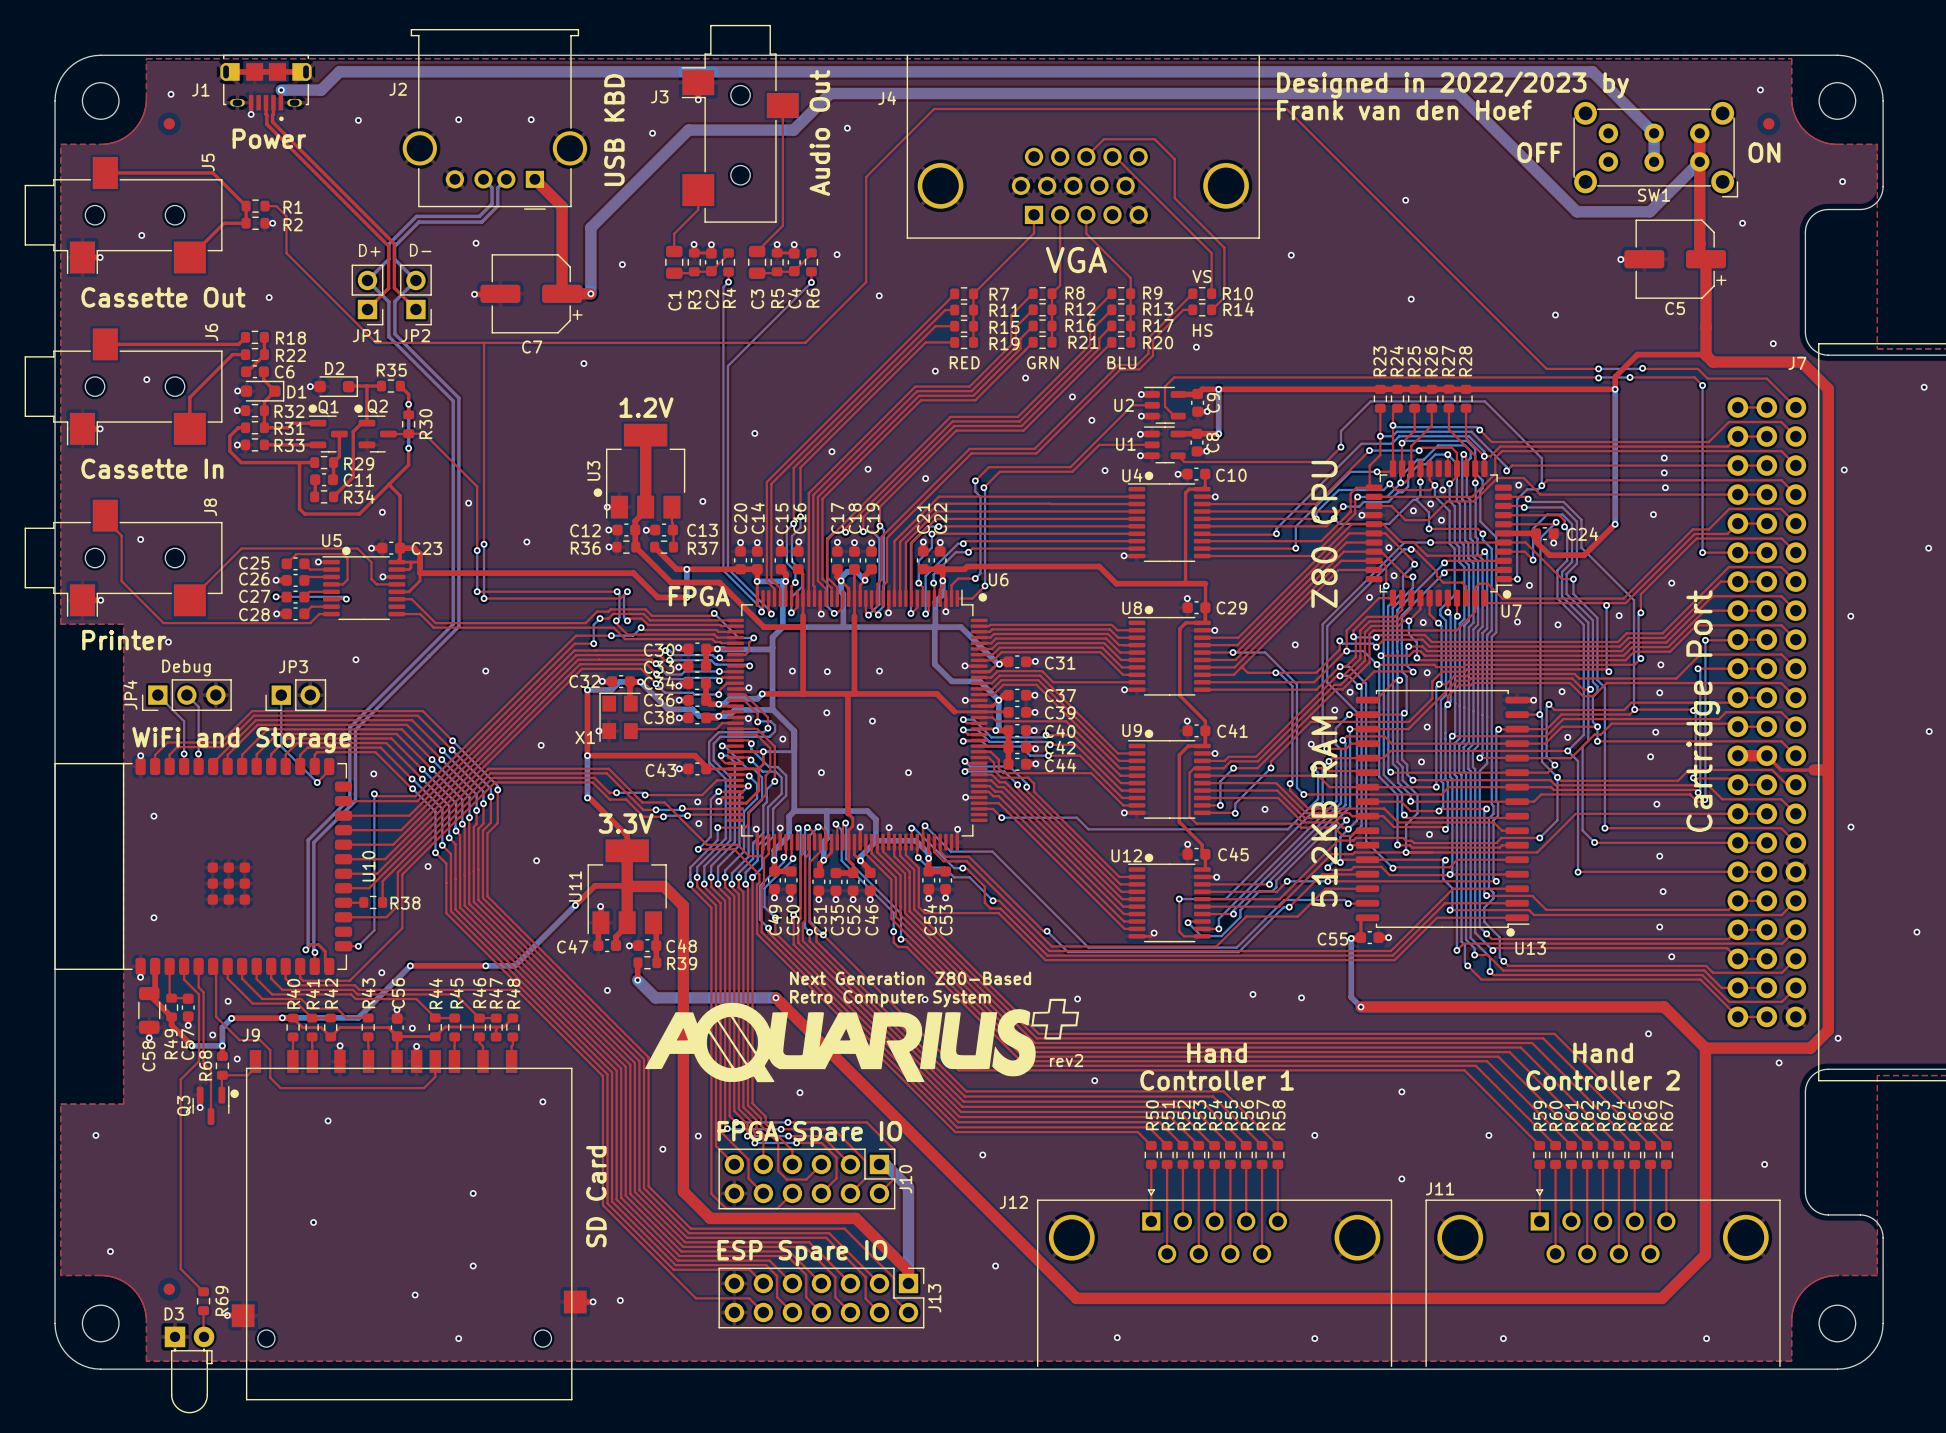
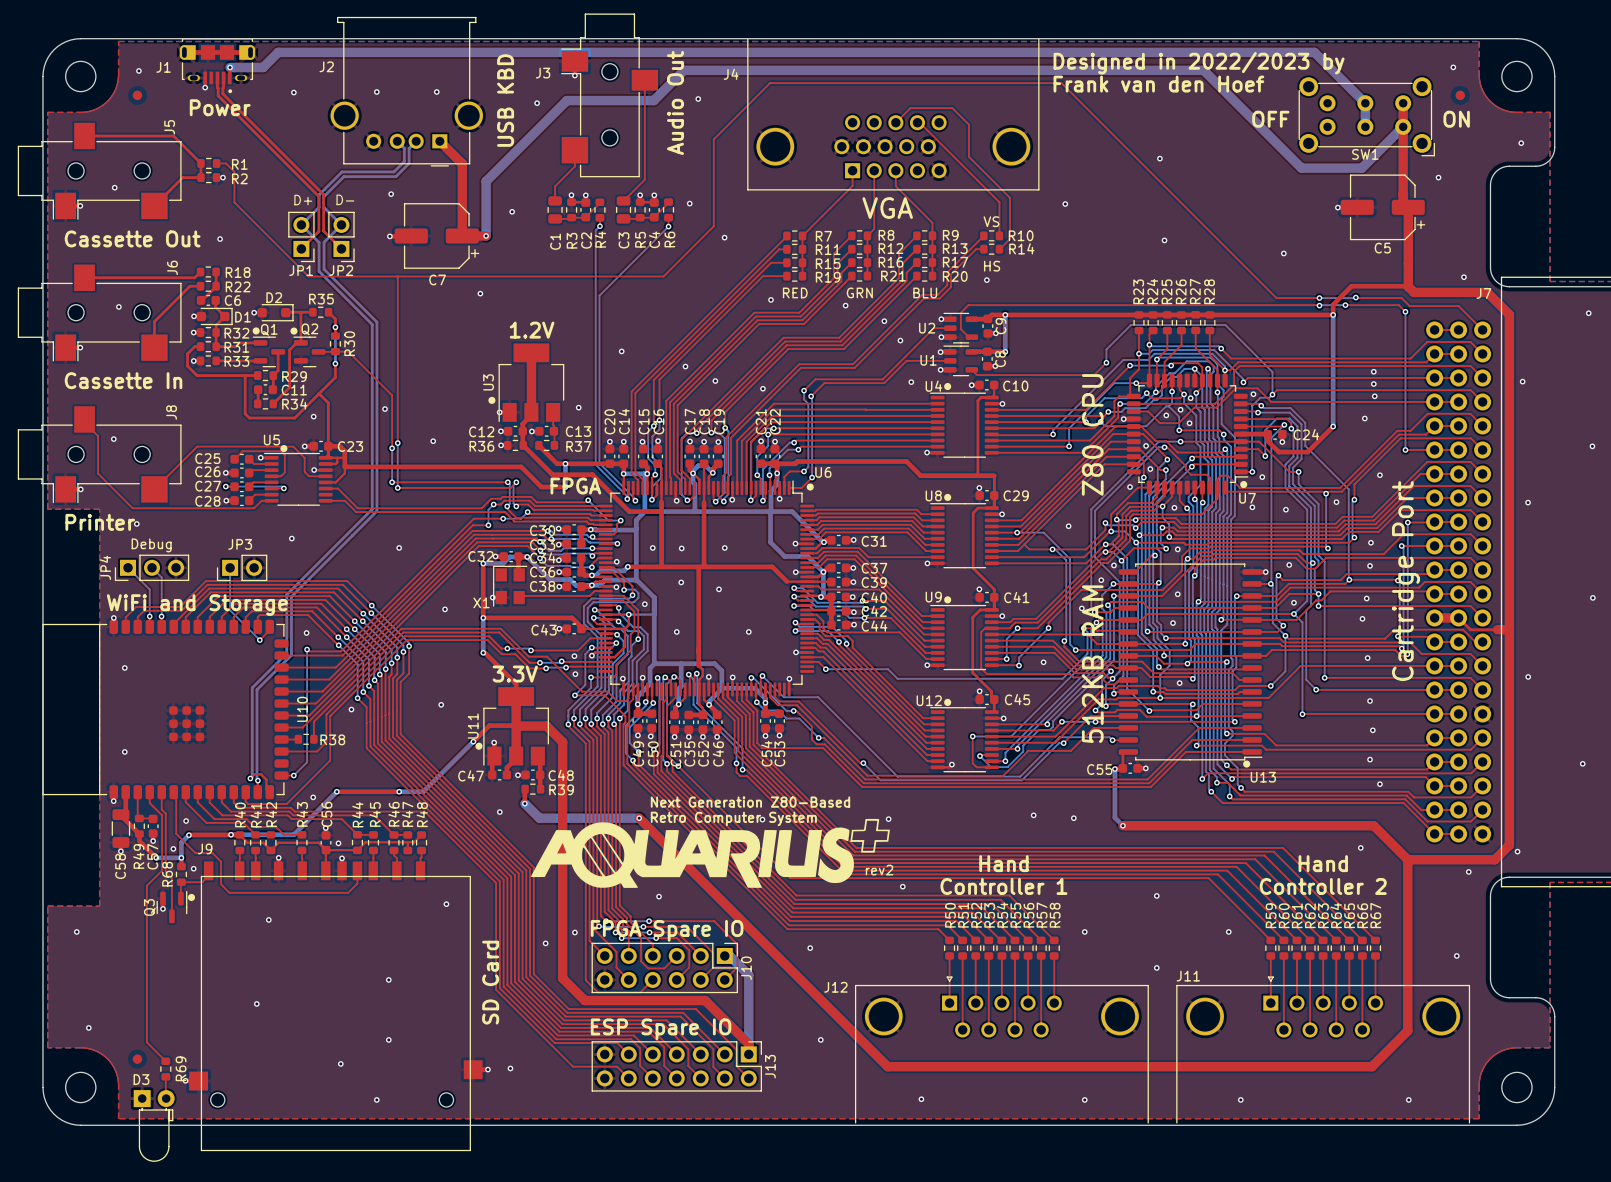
drawing: none -> [475, 742, 483, 750]

